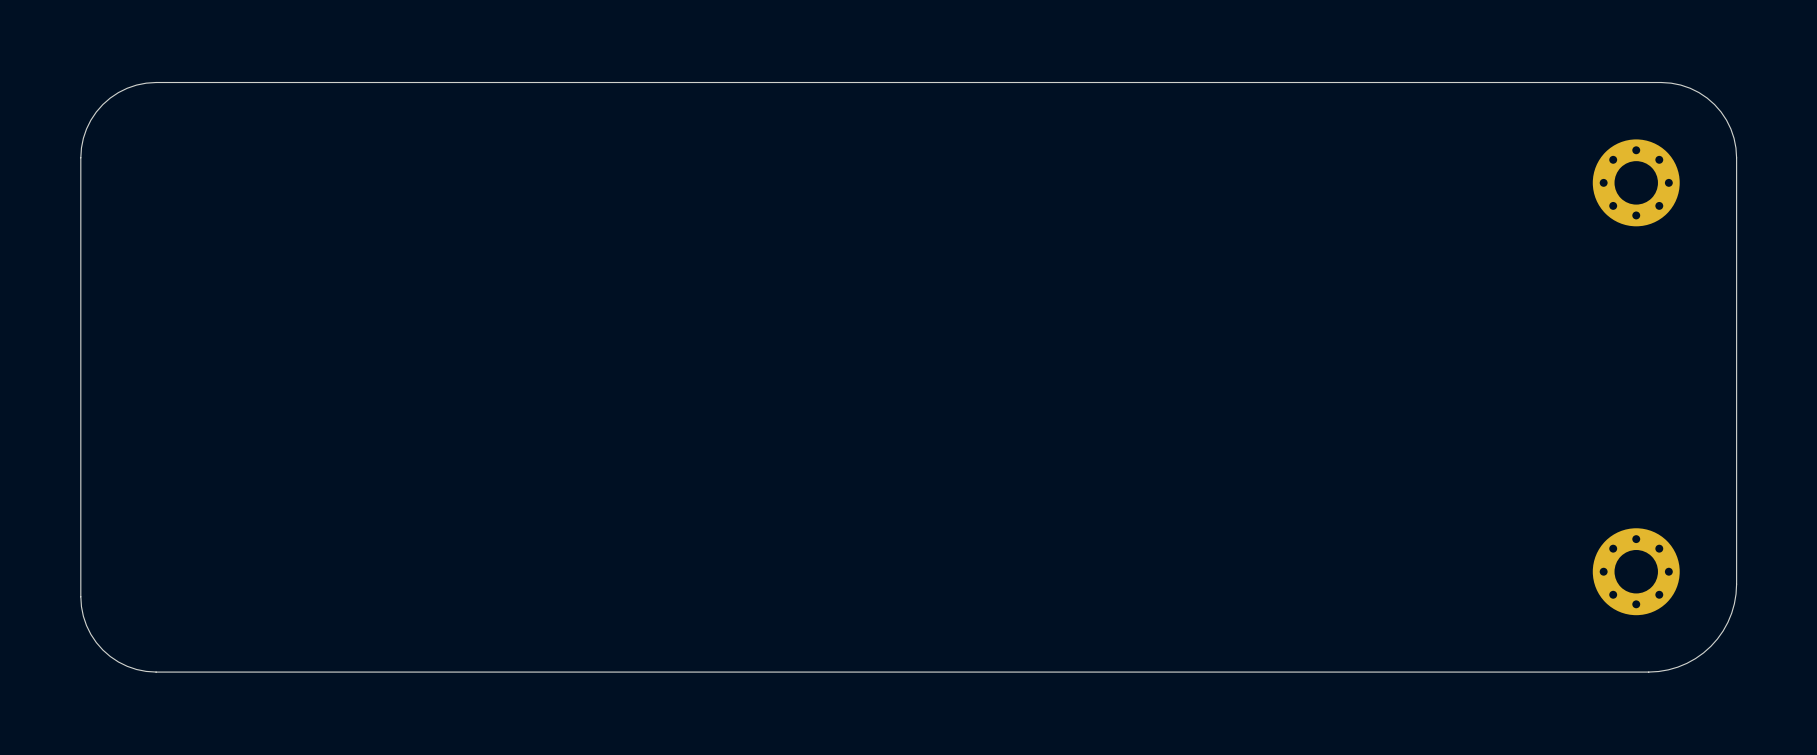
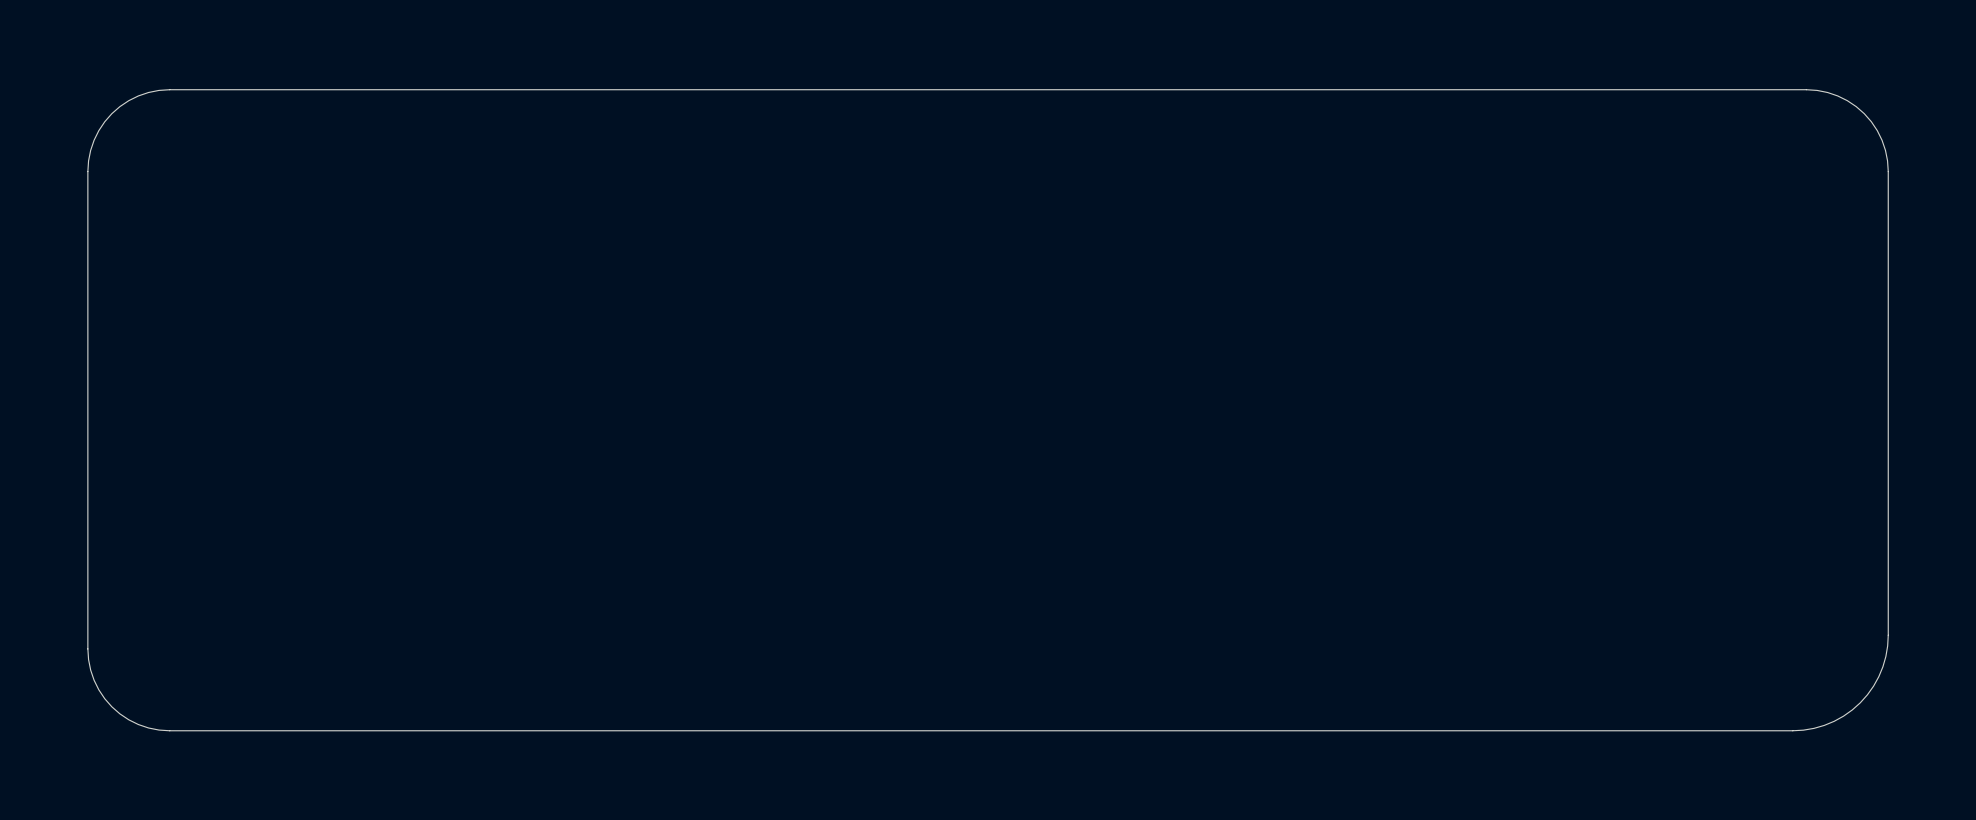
part: (1636, 182) -> none
part: (1636, 571) -> none

